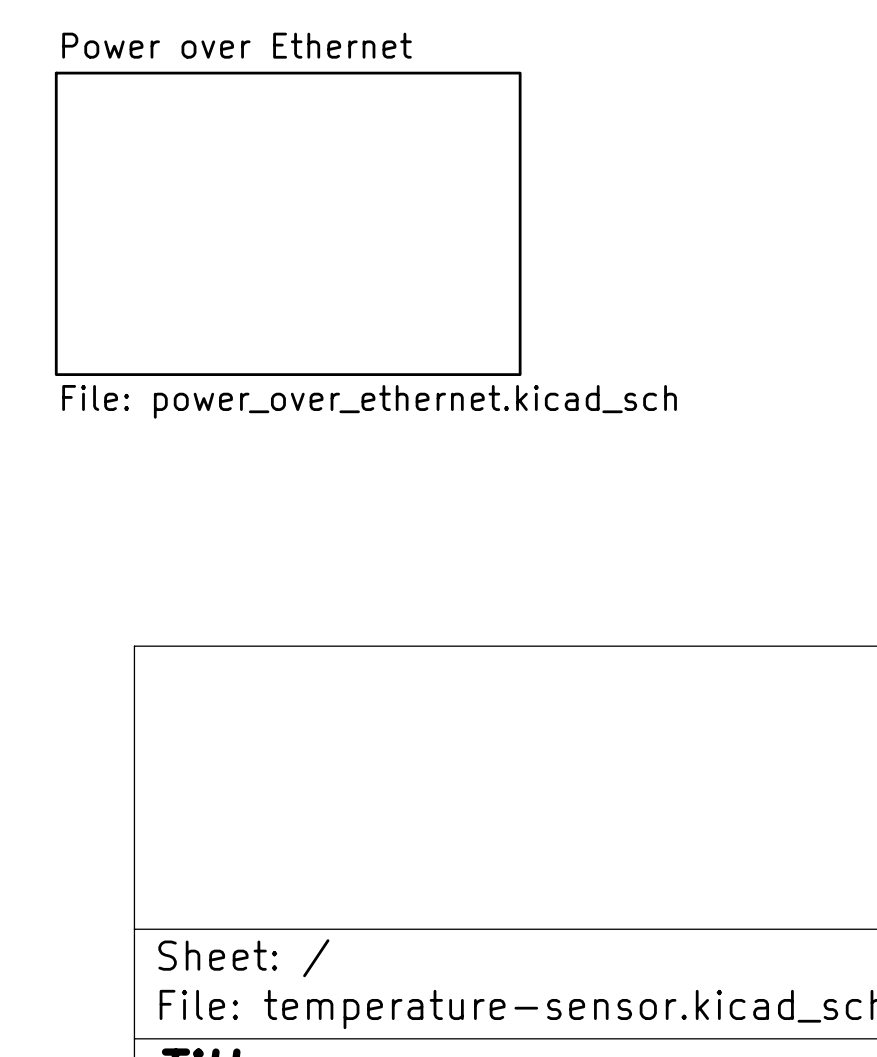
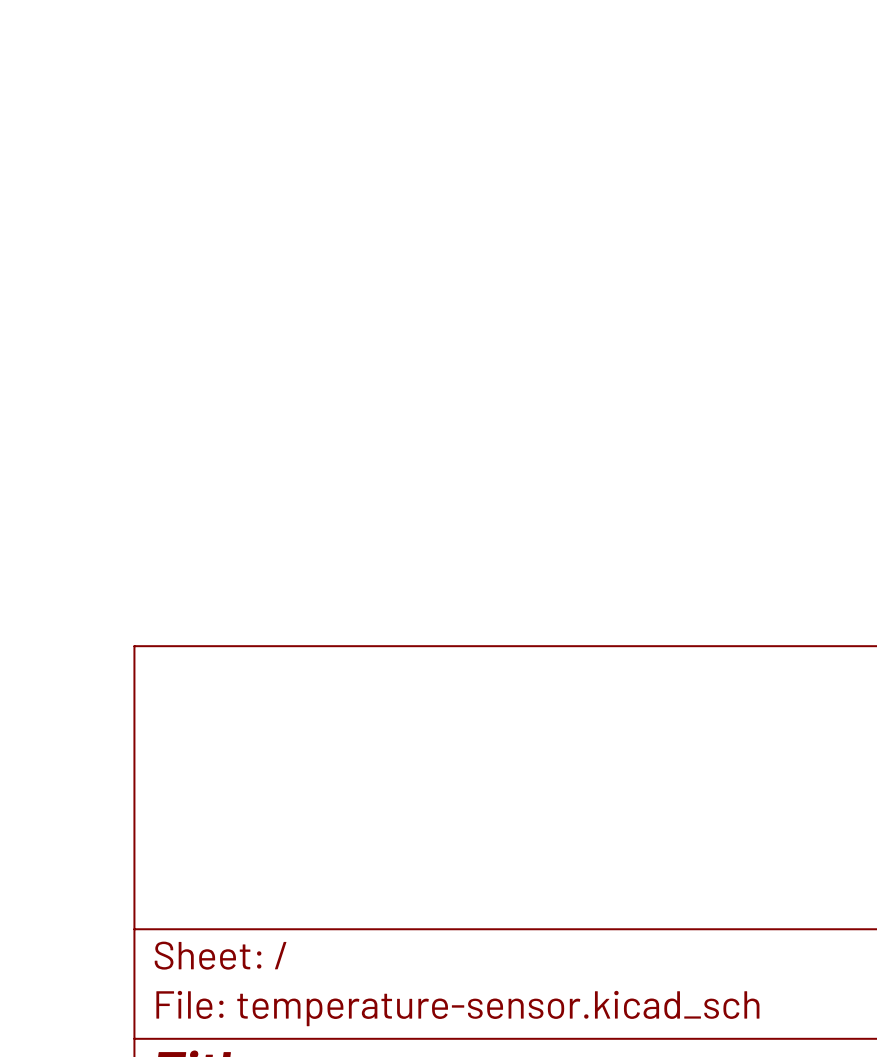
sheet Power over Ethernet: File: power_over_ethernet.kicad_sch (288, 223) -> none

